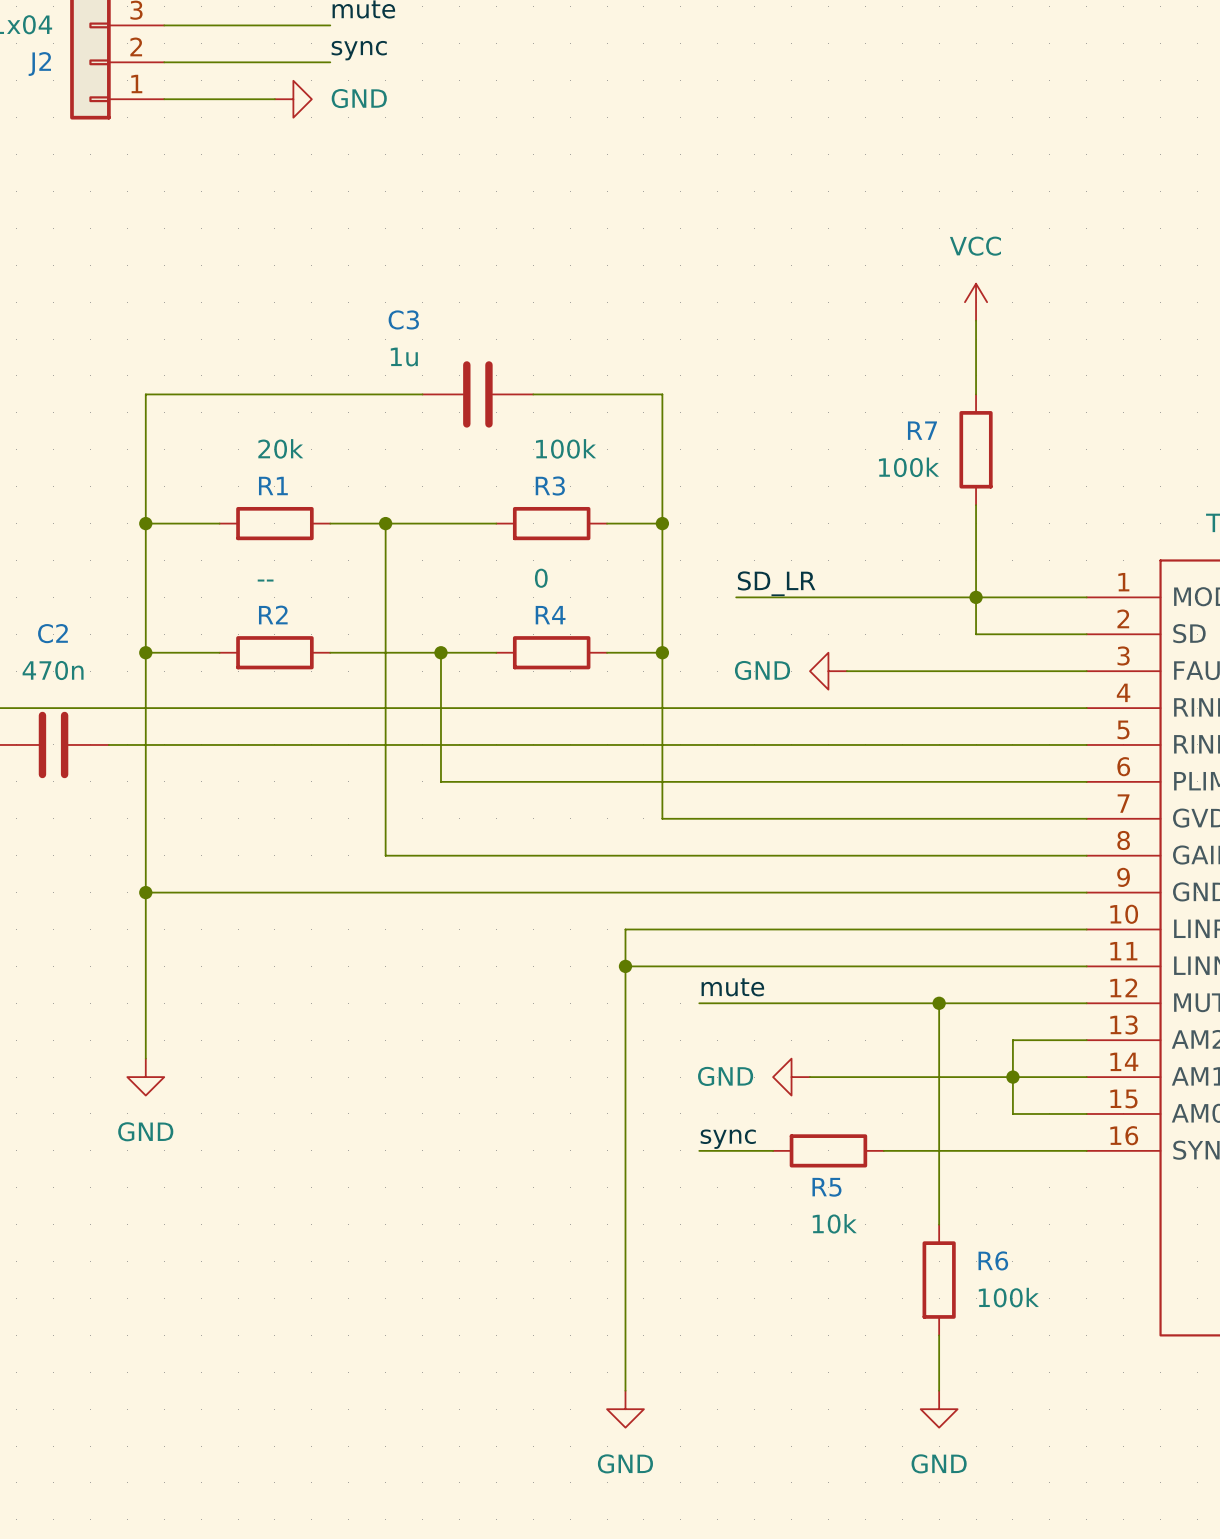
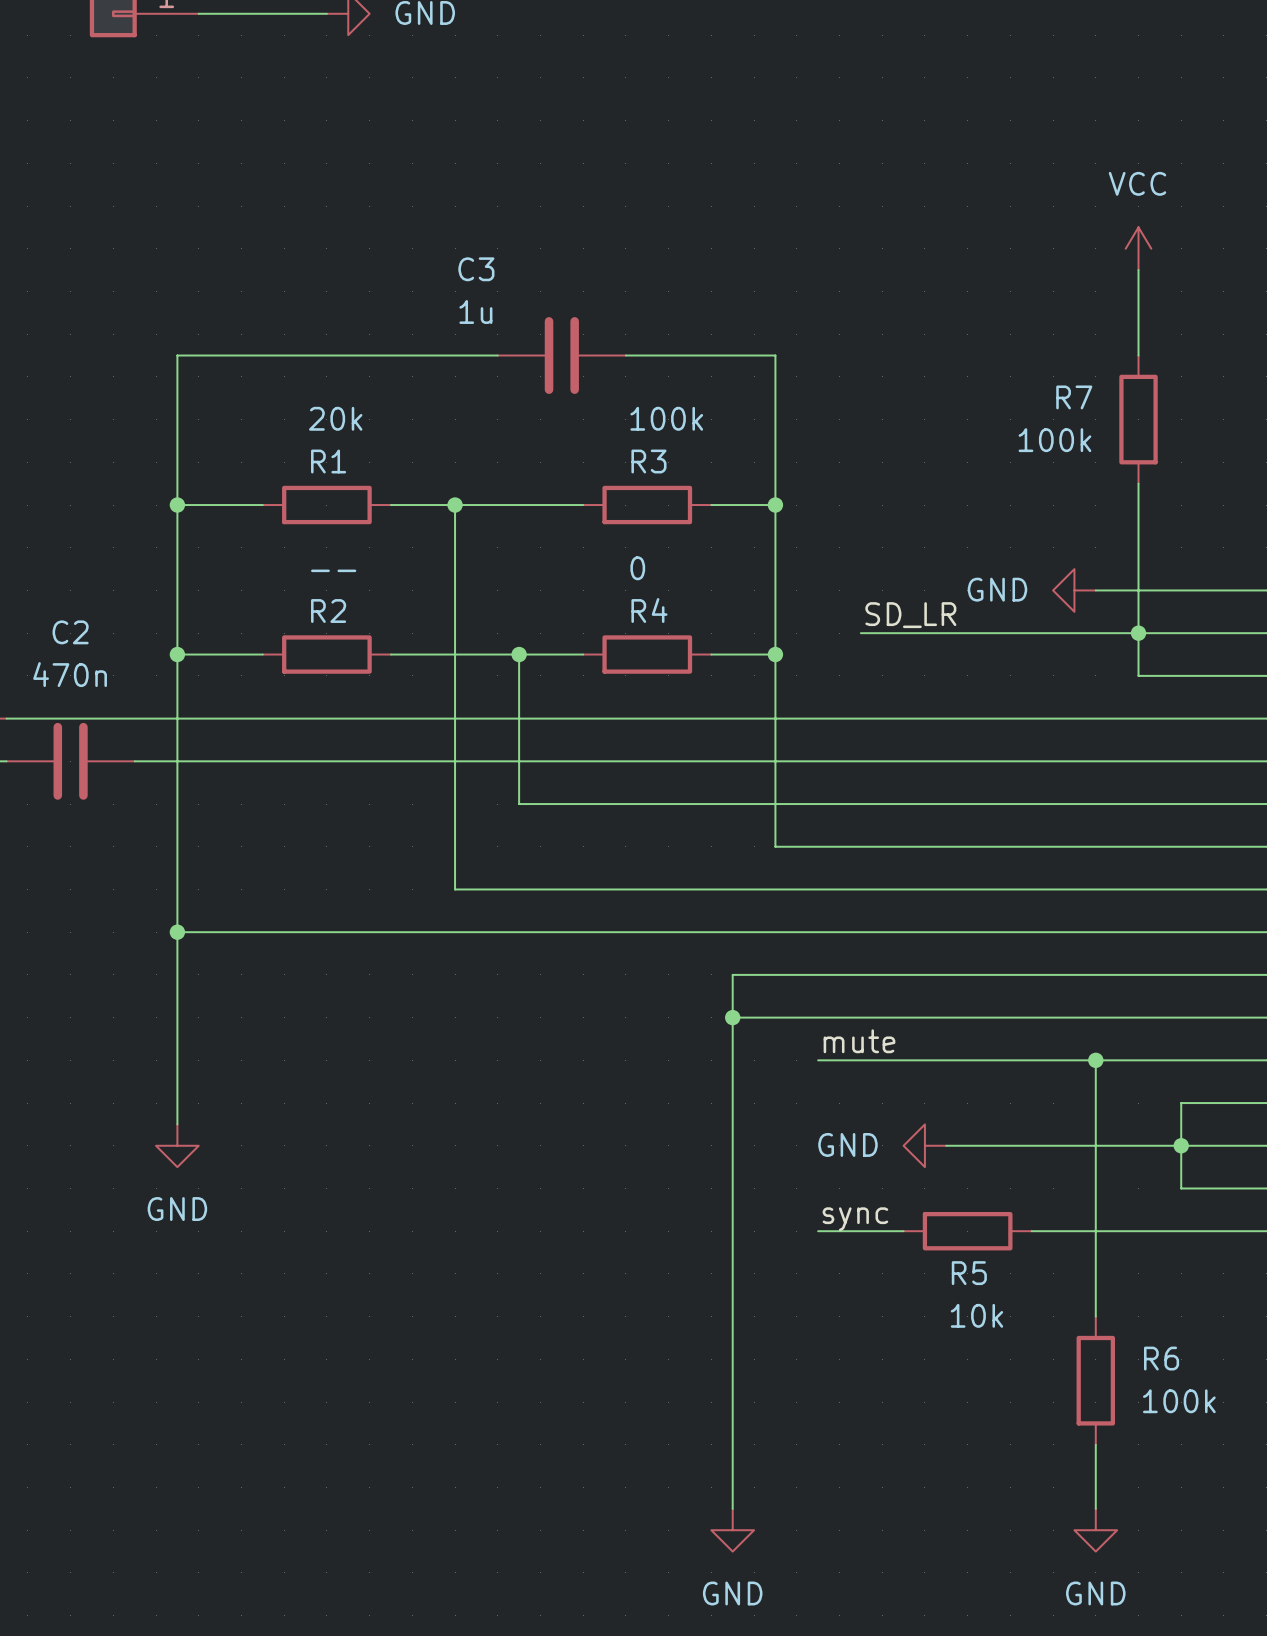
label position: SD_LR (776, 583) -> SD_LR (910, 615)
wire: (736, 597) (939, 597) -> none
junction position: (976, 597) -> (1138, 633)
power symbol position: GND (828, 671) -> GND (1074, 590)
wire: (846, 671) (976, 671) -> (860, 633) (1138, 633) (1138, 675)

